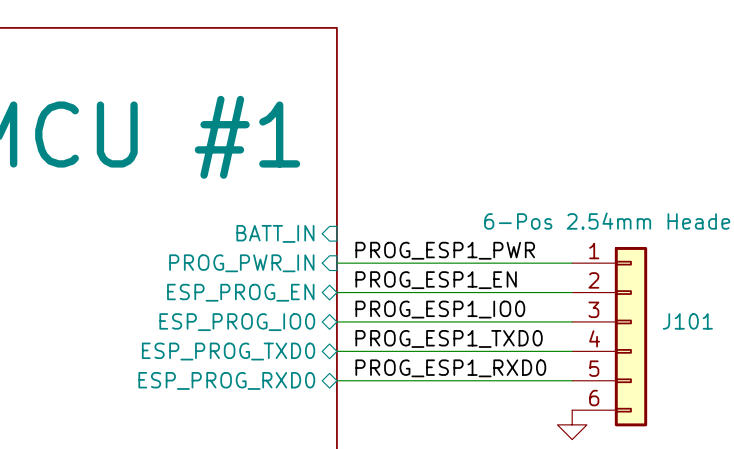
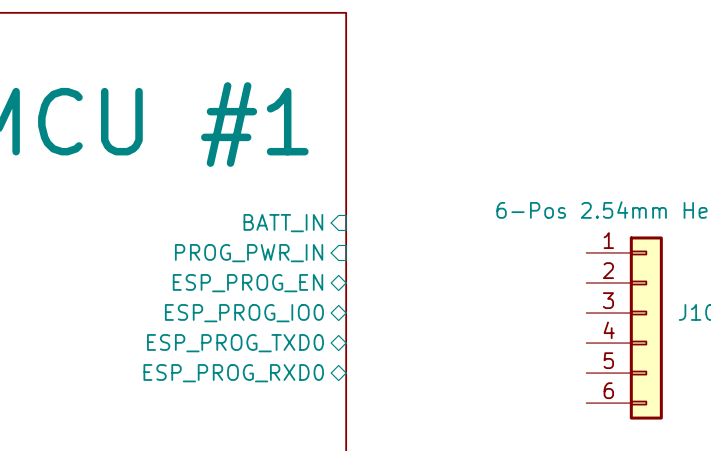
label: PROG_ESP1_PWR (445, 250) -> none
wire: (336, 263) (572, 263) -> none
label: PROG_ESP1_EN (436, 280) -> none
wire: (336, 292) (572, 292) -> none
label: PROG_ESP1_IO0 (440, 309) -> none
wire: (336, 321) (572, 321) -> none
label: PROG_ESP1_TXD0 (449, 338) -> none
wire: (336, 351) (572, 351) -> none
label: PROG_ESP1_RXD0 (450, 368) -> none
wire: (336, 380) (572, 380) -> none
power symbol: (572, 424) -> none

